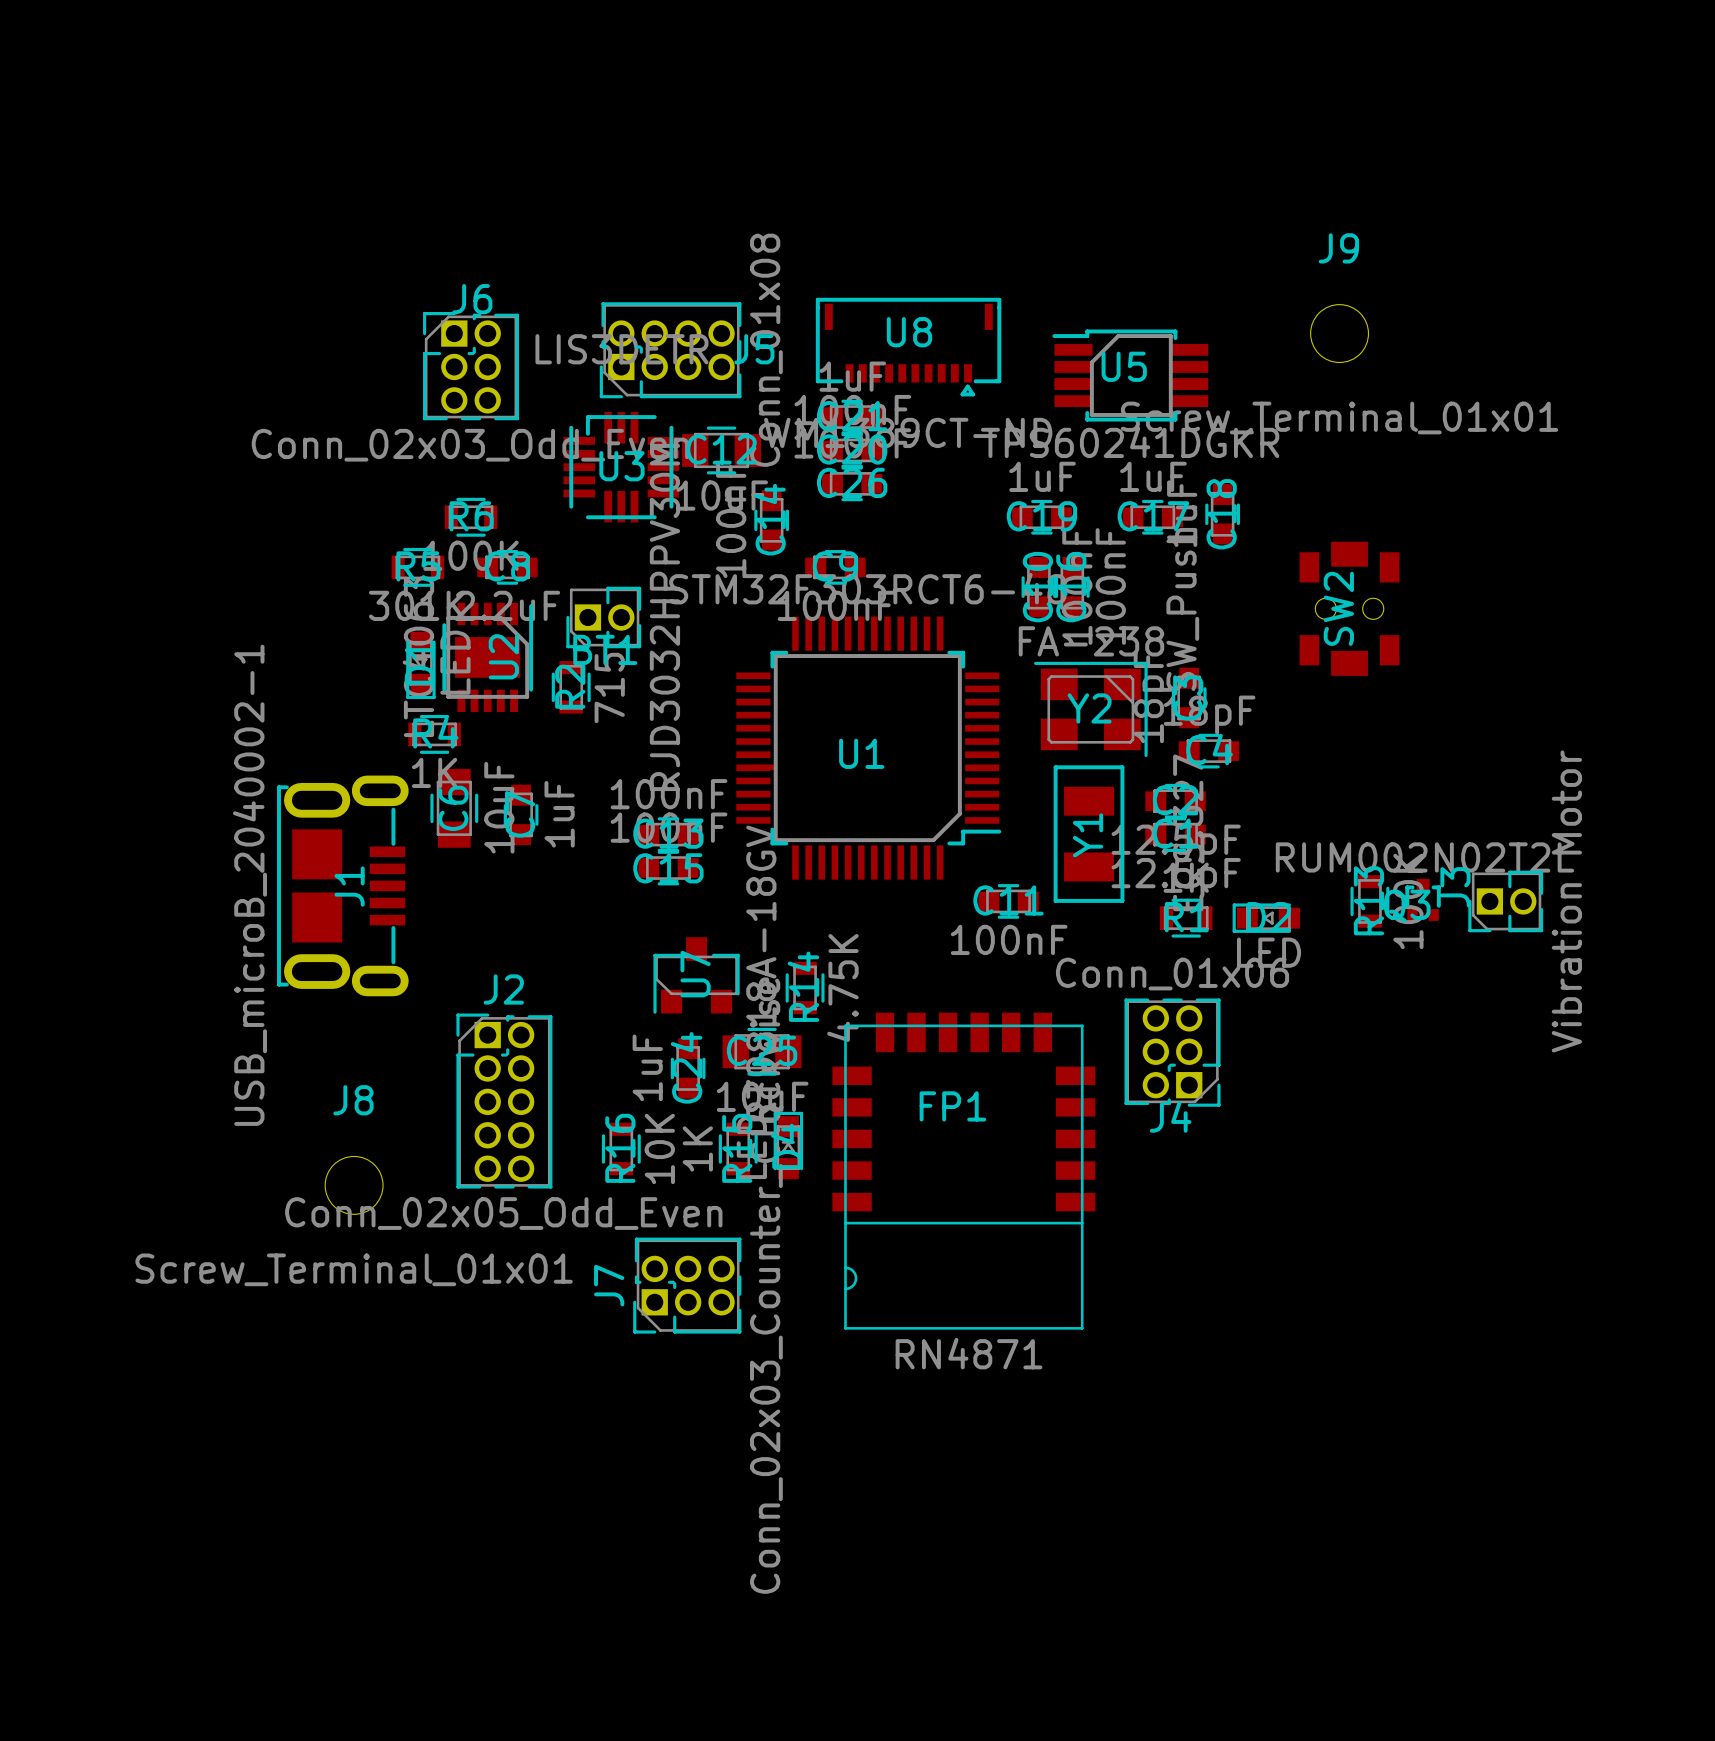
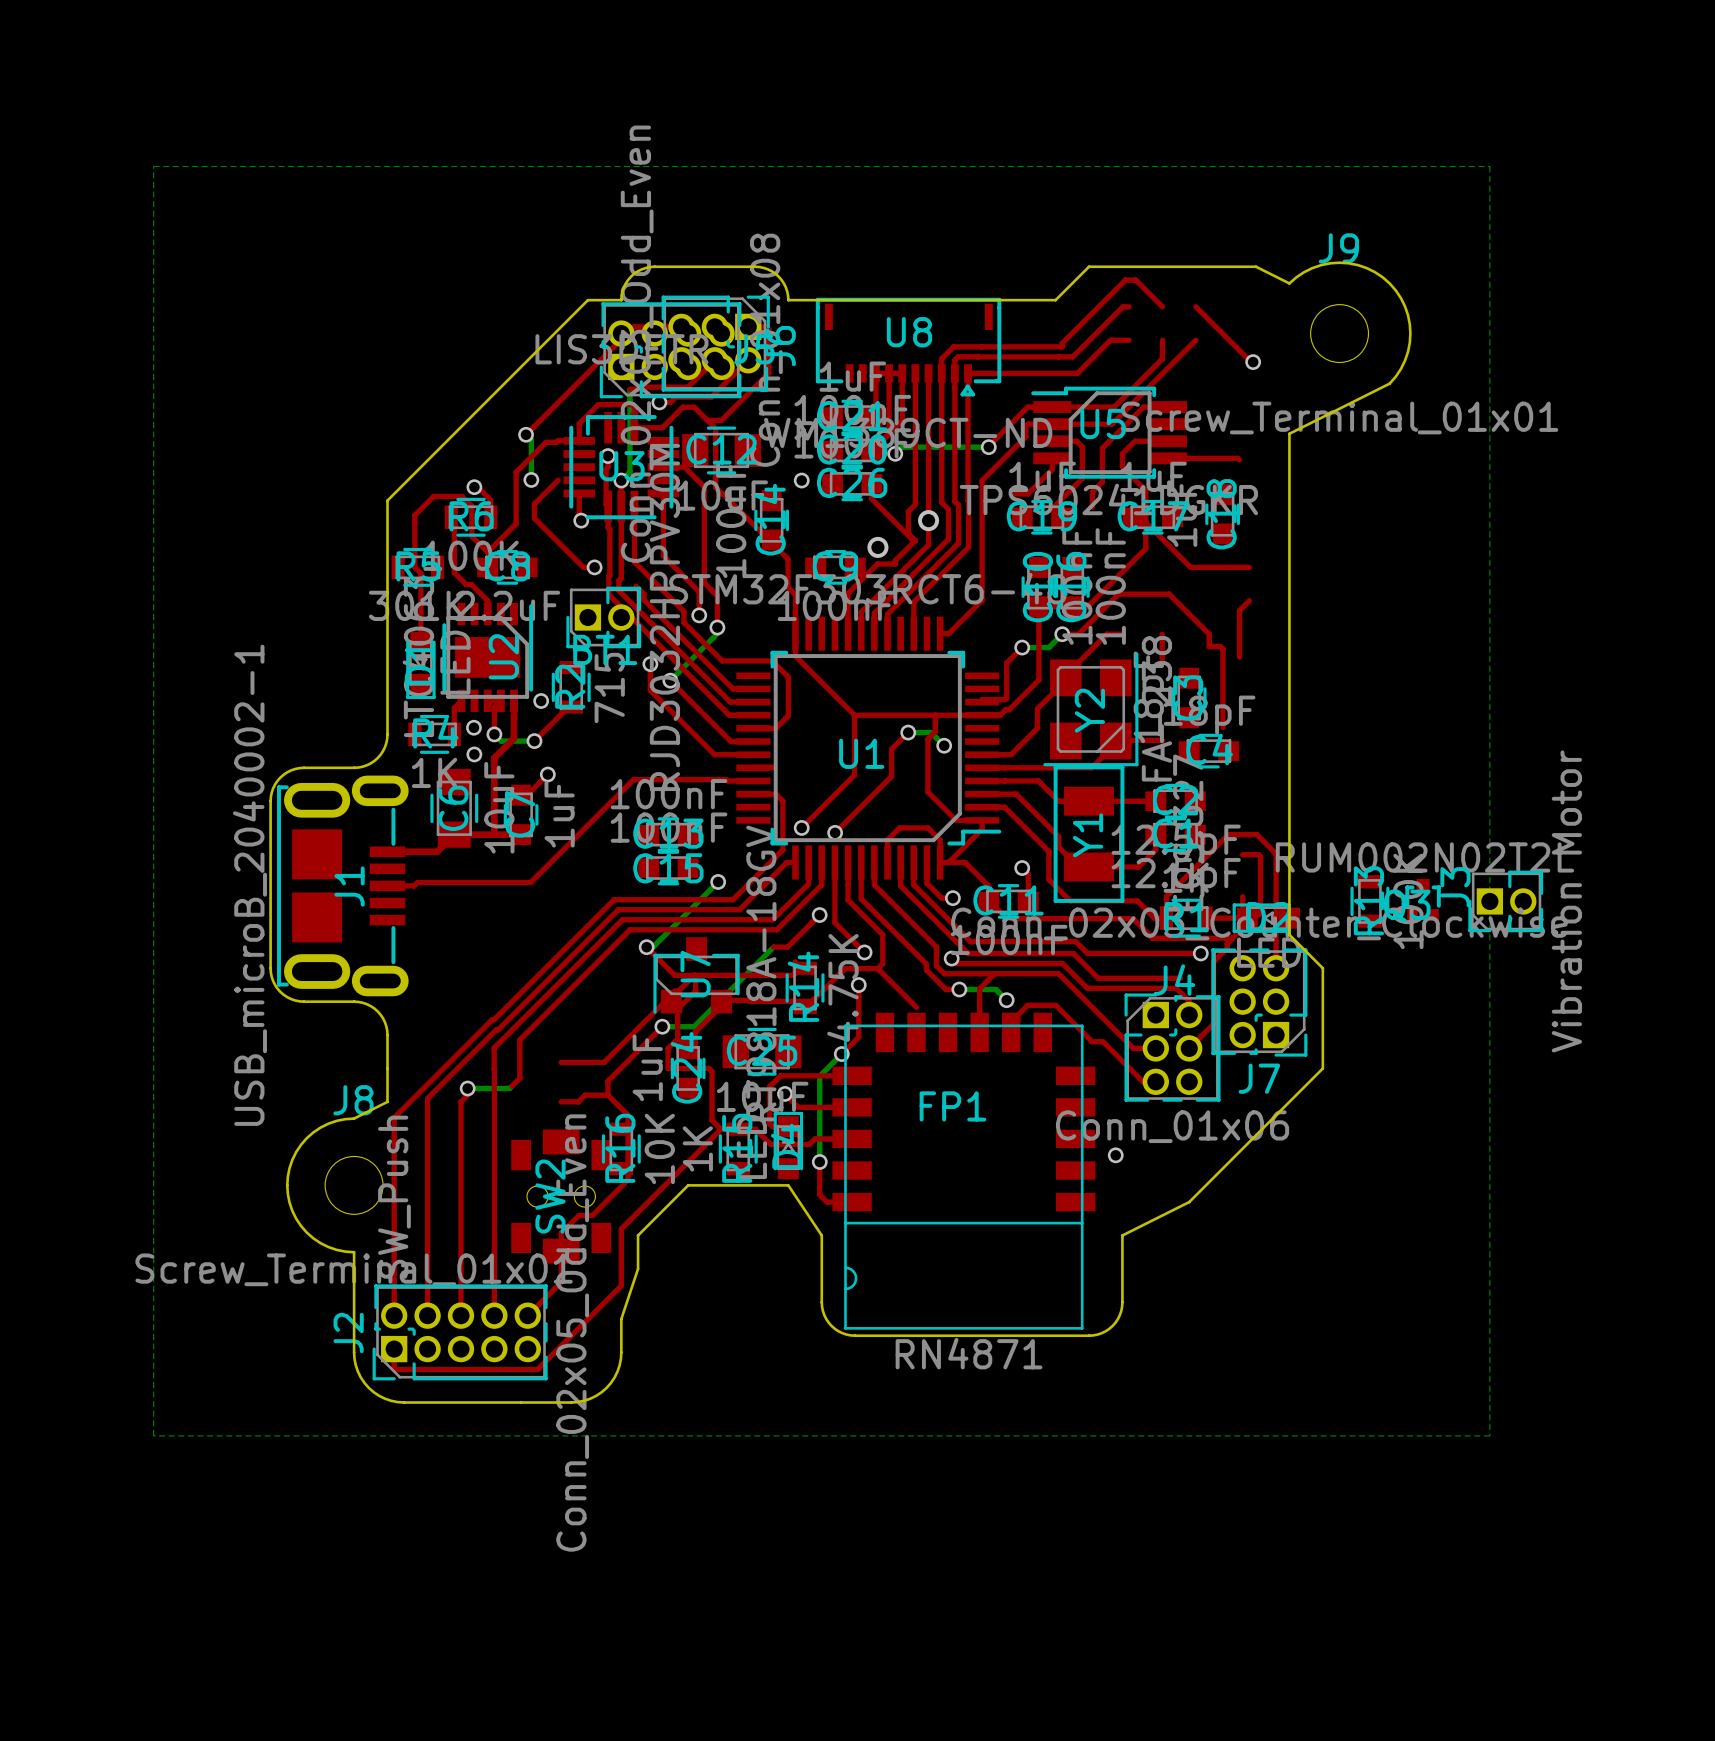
bottom zone outline: none -> (153, 166) (1489, 166) (1489, 1435) (153, 1435) (153, 166)
board edge: none -> (654, 266) (763, 267) (771, 271) (781, 279) (787, 291) (788, 300) (1055, 300) (1089, 266) (1256, 266) (1289, 283) (1312, 268) (1339, 262) (1357, 265) (1374, 272) (1395, 290) (1405, 306) (1410, 333) (1405, 360) (1395, 376) (1389, 383) (1289, 433) (1289, 934) (1322, 968) (1322, 1068) (1189, 1202) (1122, 1235) (1121, 1310) (1112, 1325) (1101, 1333) (1089, 1335) (855, 1335) (842, 1333) (831, 1325) (822, 1310) (821, 1235) (788, 1185) (688, 1185) (638, 1235) (638, 1268) (621, 1319) (619, 1365) (614, 1377) (601, 1392) (584, 1400) (571, 1402) (404, 1402) (391, 1400) (379, 1395) (368, 1387) (360, 1377) (355, 1365) (354, 1352) (354, 1252) (328, 1247) (306, 1232) (292, 1210) (287, 1185) (292, 1159) (301, 1144) (313, 1132) (336, 1120) (354, 1118) (387, 1101) (387, 1030) (380, 1014) (366, 1004) (354, 1001) (295, 1000) (283, 994) (273, 981) (270, 968) (271, 792) (277, 780) (291, 770) (303, 767) (362, 766) (374, 760) (384, 747) (387, 734) (387, 500) (587, 300) (621, 300) (623, 287) (631, 276) (641, 269) (654, 266)
top track: none -> (1129, 306) (1122, 306) (1072, 356) (958, 356) (954, 360) (954, 501) (958, 505) (958, 543) (887, 614) (887, 633)
top track: none -> (1162, 306) (1135, 280) (1125, 280) (1062, 343) (1062, 346) (953, 346) (941, 358) (941, 502) (948, 509) (948, 539) (874, 613) (874, 633)
top track: none -> (1195, 306) (1253, 362)
top track: none -> (681, 326) (633, 326) (526, 434)
top track: none -> (748, 326) (766, 326) (768, 328) (768, 373) (721, 420) (707, 420)
top track: none -> (1129, 340) (1110, 340) (1077, 373) (968, 373) (968, 547) (913, 602) (913, 633)
top track: none -> (1162, 340) (1162, 358) (1114, 407) (1027, 407) (988, 447)
top track: none -> (1195, 340) (1112, 424) (1027, 424) (1025, 426) (1025, 436) (982, 480) (982, 600) (948, 633) (940, 633)
top track: none -> (714, 360) (688, 387) (643, 387) (641, 389) (629, 389)
top track: none -> (748, 360) (711, 397) (675, 397) (670, 402) (659, 402)
via: none -> (1253, 362)
J6 rotation: 0° (471, 366) -> 90° clockwise (715, 343)
J6 position: (471, 366) -> (715, 343)
top track: none -> (889, 373) (889, 433)
top track: none -> (915, 373) (915, 504) (908, 511) (908, 533) (915, 540)
top track: none -> (928, 373) (928, 544) (861, 612) (861, 633)
U5 position: (1130, 375) -> (1109, 432)
bottom track: none -> (629, 389) (629, 471) (621, 480)
via: none -> (659, 402)
top track: none -> (1168, 407) (1143, 407) (1102, 448) (1102, 482) (1092, 492) (1092, 507)
top track: none -> (871, 417) (875, 412) (875, 373) (902, 373) (902, 420) (871, 450) (875, 453) (895, 453)
bottom track: none -> (526, 434) (531, 440) (531, 479)
via: none -> (526, 434)
top track: none -> (1052, 441) (1076, 441) (1082, 446) (1082, 478) (1052, 507)
top track: none -> (1168, 441) (1134, 441) (1122, 453) (1122, 467) (1145, 490) (1145, 548) (1087, 606) (1038, 606) (1038, 680) (1009, 709) (1005, 709) (1000, 715) (854, 715)
bottom track: none -> (988, 447) (901, 447) (895, 453)
via: none -> (988, 447)
via: none -> (895, 453)
top track: none -> (607, 456) (606, 504) (608, 506) (608, 527) (609, 529) (608, 594) (729, 715) (753, 715)
via: none -> (607, 456)
top track: none -> (1052, 458) (1052, 469) (1027, 493) (1015, 493)
top track: none -> (1168, 458) (1239, 459)
top track: none -> (663, 467) (684, 467) (704, 486) (704, 582) (717, 595) (717, 627)
via: none -> (531, 479)
top track: none -> (558, 480) (534, 503) (534, 518) (583, 567) (594, 567)
top track: none -> (621, 480) (621, 578) (618, 580) (618, 590) (730, 702) (753, 702)
via: none -> (621, 480)
via: none -> (801, 480)
top track: none -> (871, 483) (871, 499) (915, 540)
top track: none -> (474, 487) (477, 487) (490, 500) (490, 517)
via: none -> (474, 487)
top track: none -> (579, 493) (579, 518) (581, 520)
top track: none -> (663, 493) (663, 556) (699, 591) (699, 615)
top track: none -> (634, 506) (634, 562) (684, 611) (684, 622) (722, 660) (772, 660) (788, 677) (788, 715) (775, 728) (753, 728)
top track: none -> (451, 517) (454, 520) (454, 572) (466, 584) (471, 584) (487, 600) (487, 614)
via: none -> (581, 520)
via: none -> (928, 520)
top track: none -> (1145, 522) (1190, 567) (1249, 567)
top track: none -> (915, 540) (895, 560) (895, 564) (877, 564) (848, 593) (848, 633)
via: none -> (877, 547)
via: none -> (594, 567)
top track: none -> (636, 586) (643, 594) (643, 599) (732, 688) (753, 688)
top track: none -> (1249, 600) (1239, 610) (1239, 657)
SW2 position: (1349, 608) -> (561, 1196)
via: none -> (699, 615)
bottom track: none -> (717, 627) (717, 633) (670, 680)
via: none -> (717, 627)
top track: none -> (1062, 634) (1078, 634) (1118, 594) (1169, 594) (1209, 634) (1209, 646) (1220, 646) (1222, 648) (1222, 727)
bottom track: none -> (1062, 634) (1048, 647) (1022, 647)
via: none -> (1062, 634)
top track: none -> (1122, 634) (1106, 634) (1065, 675) (1065, 680) (1037, 708) (1037, 728) (1011, 754) (982, 754)
top track: none -> (1162, 634) (1162, 660)
top track: none -> (420, 642) (420, 573) (414, 567) (414, 515) (433, 496) (462, 496) (471, 506) (471, 536) (487, 552) (516, 523) (516, 472) (546, 442) (579, 440) (579, 423) (598, 404) (632, 404) (634, 406) (634, 427) (662, 427) (682, 407) (694, 407) (715, 428) (715, 487) (788, 559) (788, 587) (795, 594) (795, 656) (854, 715)
top track: none -> (1022, 647) (1006, 663) (1006, 698) (982, 699) (982, 702)
via: none -> (1022, 647)
top track: none -> (650, 664) (650, 690) (714, 754) (753, 754)
via: none -> (650, 664)
top track: none -> (670, 680) (730, 741) (753, 741)
via: none -> (670, 680)
top track: none -> (461, 700) (454, 707) (454, 734)
top track: none -> (487, 700) (500, 700) (494, 707) (494, 734)
top track: none -> (514, 700) (514, 738) (494, 757) (494, 834)
via: none -> (541, 701)
top track: none -> (571, 707) (568, 707) (534, 741)
Y2 rotation: 0° (1090, 709) -> 90° clockwise (1090, 709)
top track: none -> (854, 715) (854, 775) (801, 827)
top track: none -> (935, 715) (935, 731) (927, 739) (927, 792) (956, 820) (982, 820) (982, 829) (948, 862)
via: none -> (473, 727)
top track: none -> (908, 732) (891, 749) (891, 776) (835, 832)
bottom track: none -> (908, 732) (931, 732) (944, 745)
via: none -> (908, 732)
bottom track: none -> (494, 734) (501, 741) (534, 741)
via: none -> (494, 734)
top track: none -> (1162, 740) (1116, 740) (1115, 743) (1091, 767) (982, 767)
via: none -> (534, 741)
via: none -> (944, 745)
via: none -> (474, 754)
top track: none -> (547, 774) (527, 795) (521, 795)
via: none -> (547, 774)
top track: none -> (753, 780) (633, 779) (530, 882) (417, 882) (414, 885) (387, 885)
top track: none -> (982, 780) (1038, 780) (1058, 801) (1155, 801)
top track: none -> (753, 794) (775, 794) (782, 801) (782, 849) (733, 899) (614, 899) (394, 1117) (394, 1315)
top track: none -> (982, 794) (1016, 794) (1058, 836) (1058, 847) (1078, 866) (1138, 866) (1155, 849) (1155, 834)
top track: none -> (982, 807) (1004, 807) (1048, 851) (1048, 879) (1070, 900) (1137, 900) (1154, 918) (1166, 918) (1166, 896) (1228, 834) (1256, 834) (1276, 853) (1276, 968)
via: none -> (801, 827)
via: none -> (835, 832)
top track: none -> (521, 835) (454, 834) (437, 851) (387, 851)
top track: none -> (1242, 854) (1258, 854) (1260, 856) (1260, 913) (1256, 914) (1227, 943) (1227, 948) (1213, 961) (1213, 1024) (1189, 1048)
top track: none -> (795, 862) (786, 862) (739, 909) (618, 909) (427, 1098) (427, 1315)
top track: none -> (808, 862) (808, 883) (772, 919) (622, 919) (494, 1047) (494, 1315)
top track: none -> (821, 862) (821, 884) (776, 929) (630, 929) (519, 1039) (519, 1078) (511, 1086)
top track: none -> (834, 862) (834, 922) (864, 952)
top track: none -> (848, 862) (848, 900) (882, 934) (882, 963) (877, 968)
top track: none -> (861, 862) (861, 898) (926, 964) (926, 970) (945, 989) (959, 989)
top track: none -> (874, 862) (874, 884) (936, 947) (936, 965) (944, 973) (1058, 973) (1133, 1048) (1155, 1048)
top track: none -> (887, 862) (887, 840) (899, 827) (928, 827) (940, 840) (940, 862) (965, 862) (988, 886) (988, 901) (1005, 917) (1133, 918) (1152, 938) (1232, 938)
top track: none -> (900, 862) (900, 885) (968, 953) (1073, 953) (1098, 978) (1180, 978)
top track: none -> (913, 862) (913, 884) (970, 941) (1075, 941) (1087, 953) (1200, 953)
top track: none -> (926, 862) (926, 883) (941, 898) (952, 898)
top track: none -> (1022, 868) (1028, 874) (1028, 901)
via: none -> (1022, 868)
bottom track: none -> (718, 881) (652, 947) (646, 947)
via: none -> (718, 881)
top track: none -> (1242, 896) (1242, 912) (1237, 918) (1205, 918)
via: none -> (952, 898)
top track: none -> (819, 915) (787, 947) (773, 947)
via: none -> (819, 915)
top track: none -> (646, 947) (674, 975) (793, 975) (795, 961)
via: none -> (646, 947)
bottom track: none -> (773, 947) (694, 1026) (662, 1026)
via: none -> (864, 952)
via: none -> (1200, 953)
top track: none -> (951, 958) (956, 963) (1062, 963) (1087, 988) (1176, 988) (1189, 1001) (1189, 1015)
via: none -> (951, 958)
top track: none -> (877, 968) (844, 968) (812, 1001) (727, 1000) (694, 1032) (694, 1048)
top track: none -> (877, 968) (916, 1007)
top track: none -> (994, 973) (979, 988) (979, 1032)
top track: none -> (694, 975) (678, 991) (675, 991) (604, 1062) (561, 1062)
top track: none -> (695, 975) (695, 991) (677, 1009) (677, 1038) (668, 1048) (668, 1068) (709, 1068) (712, 1071) (712, 1120) (721, 1129)
top track: none -> (858, 985) (858, 1037) (841, 1054)
via: none -> (858, 985)
bottom track: none -> (959, 989) (995, 989) (1006, 1000)
via: none -> (959, 989)
via: none -> (1006, 1000)
top track: none -> (1011, 1021) (1027, 1005) (1055, 1005) (1092, 1041) (1102, 1041) (1143, 1081) (1155, 1081)
top track: none -> (662, 1026) (607, 1081) (607, 1095)
via: none -> (662, 1026)
J4 rotation: 0° (1172, 1052) -> 180° (1172, 1047)
bottom track: none -> (841, 1054) (819, 1076) (819, 1162)
via: none -> (841, 1054)
top track: none -> (852, 1075) (780, 1075) (769, 1086) (769, 1123) (772, 1126) (788, 1126) (788, 1121)
bottom track: none -> (511, 1086) (509, 1088) (467, 1088)
top track: none -> (467, 1088) (467, 1095) (460, 1101) (460, 1315)
via: none -> (467, 1088)
top track: none -> (784, 1093) (798, 1107) (852, 1107)
via: none -> (784, 1093)
top track: none -> (607, 1095) (585, 1095) (578, 1101) (561, 1101)
top track: none -> (607, 1095) (628, 1115) (628, 1179) (592, 1215) (578, 1215) (561, 1233) (561, 1282) (527, 1315)
J2 rotation: 0° (504, 1101) -> 90° counterclockwise (460, 1332)
J2 position: (504, 1101) -> (460, 1332)
top track: none -> (721, 1129) (621, 1228) (621, 1285) (537, 1369) (396, 1369) (394, 1367) (394, 1349)
top track: none -> (721, 1129) (755, 1129) (770, 1144) (809, 1144) (815, 1138) (852, 1138)
via: none -> (1115, 1155)
top track: none -> (819, 1162) (819, 1194) (827, 1202) (852, 1202)
via: none -> (819, 1162)
J7 rotation: 0° (687, 1285) -> 90° counterclockwise (1259, 1002)
J7 position: (687, 1285) -> (1259, 1002)

